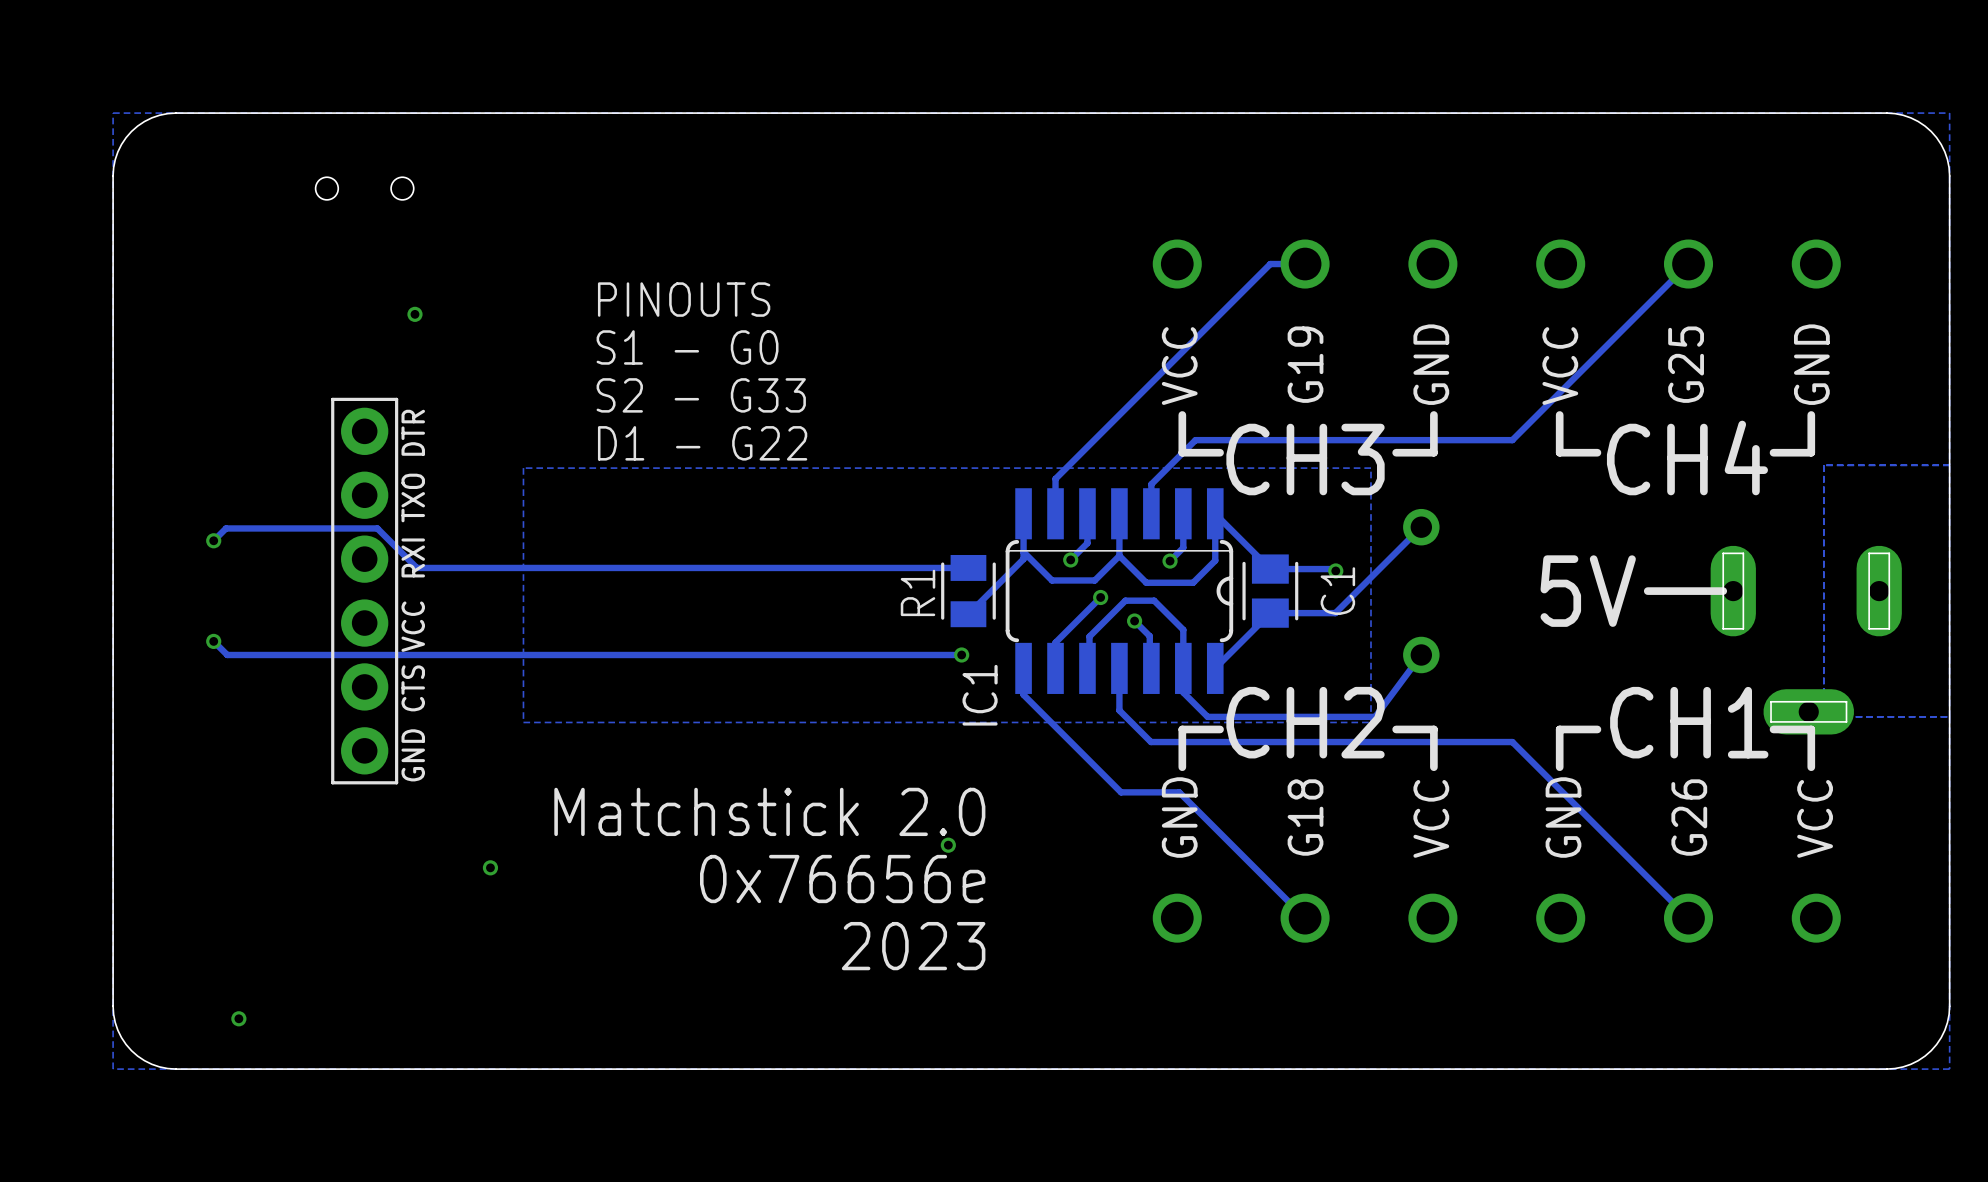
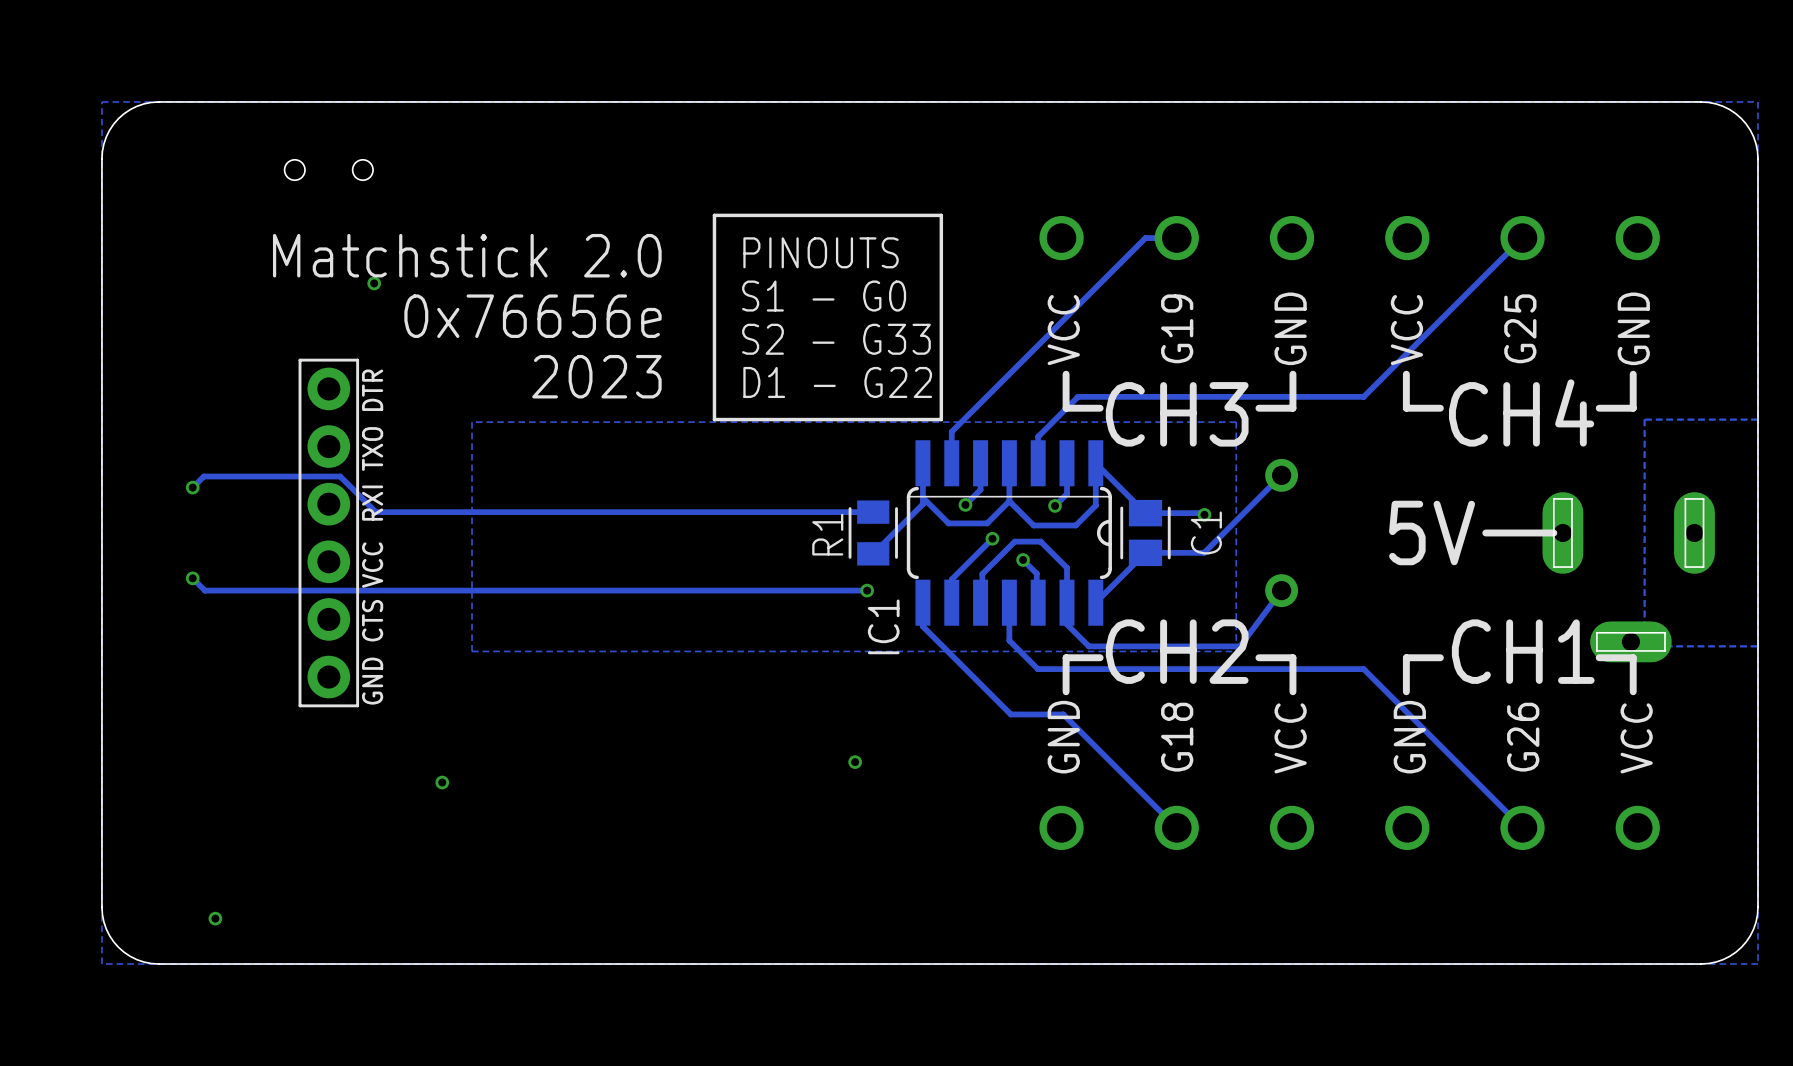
line: none -> (941, 215) (941, 419) (714, 419) (714, 215) (941, 215)
text position: PINOUTS (684, 299) -> PINOUTS (821, 252)
text position: S1 - G0 (687, 347) -> S1 - G0 (824, 296)
text position: S2 - G33 (701, 395) -> S2 - G33 (836, 339)
text position: D1 - G22 (702, 443) -> D1 - G22 (837, 382)
text position: Matchstick 2.0 (769, 811) -> Matchstick 2.0 (467, 255)
text position: 0x76656e (842, 879) -> 0x76656e (533, 316)
text position: 2023 (913, 946) -> 2023 (596, 376)

